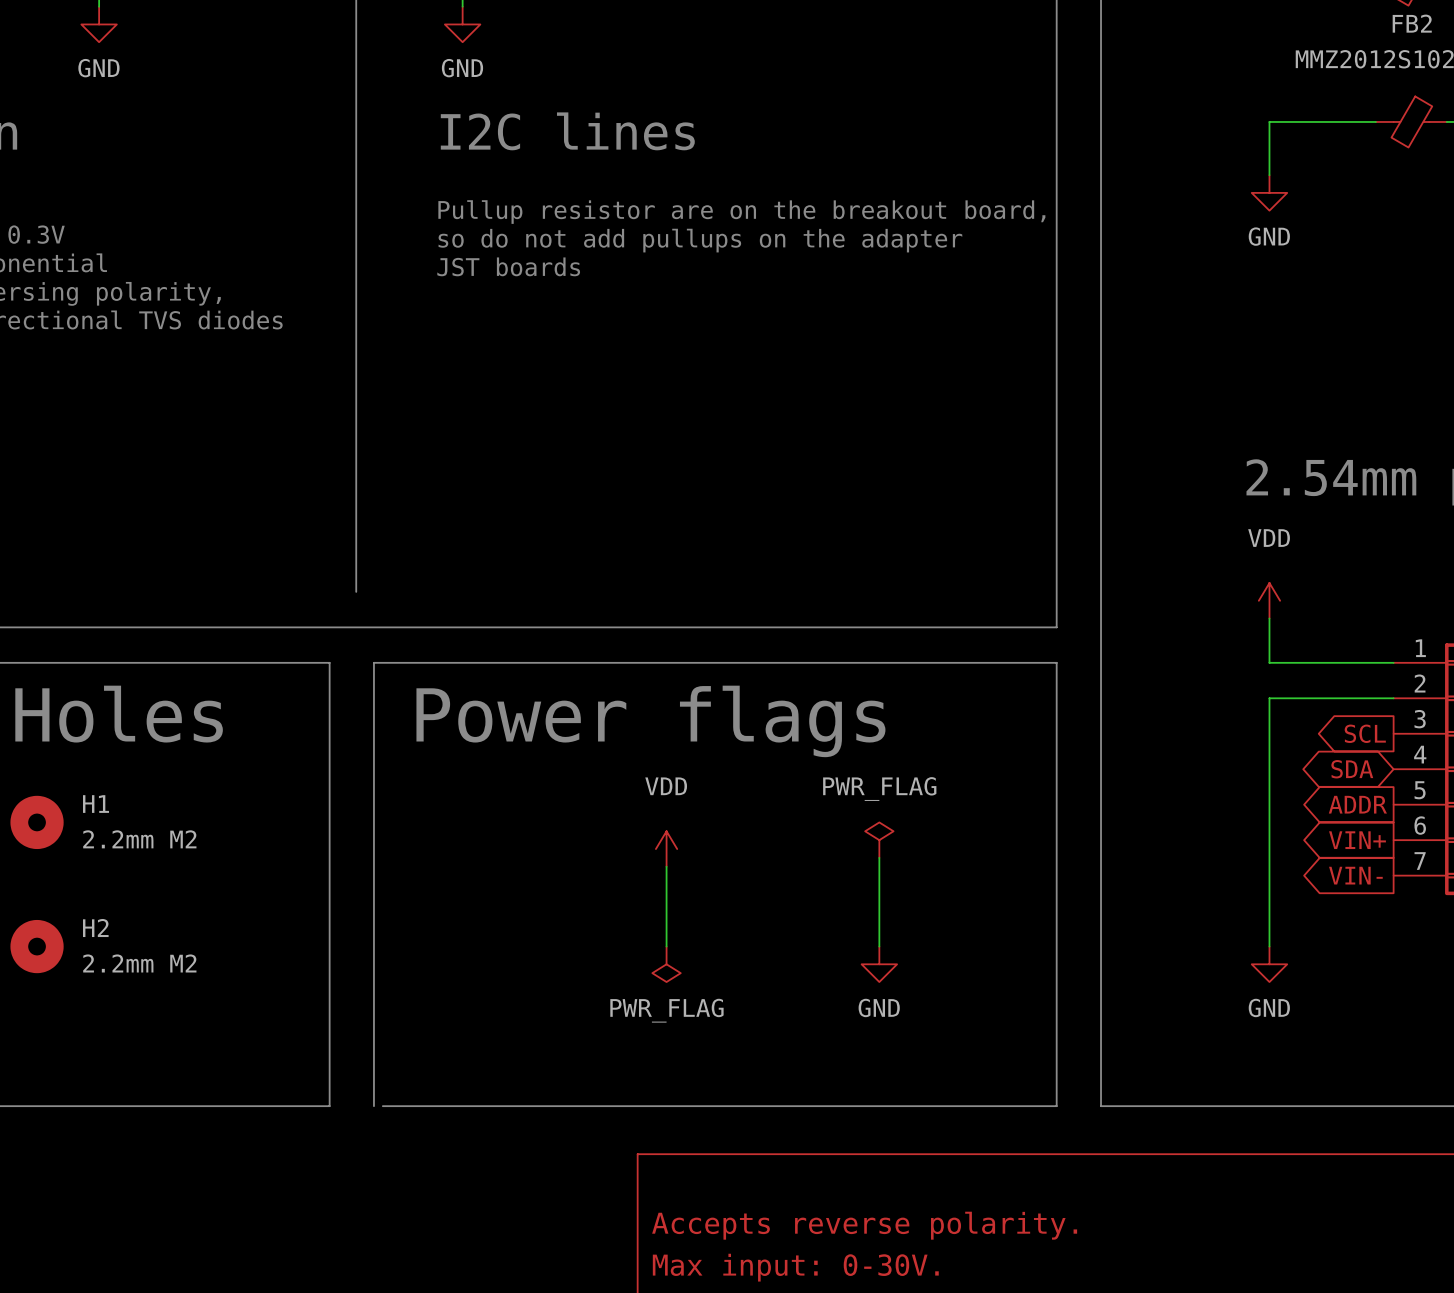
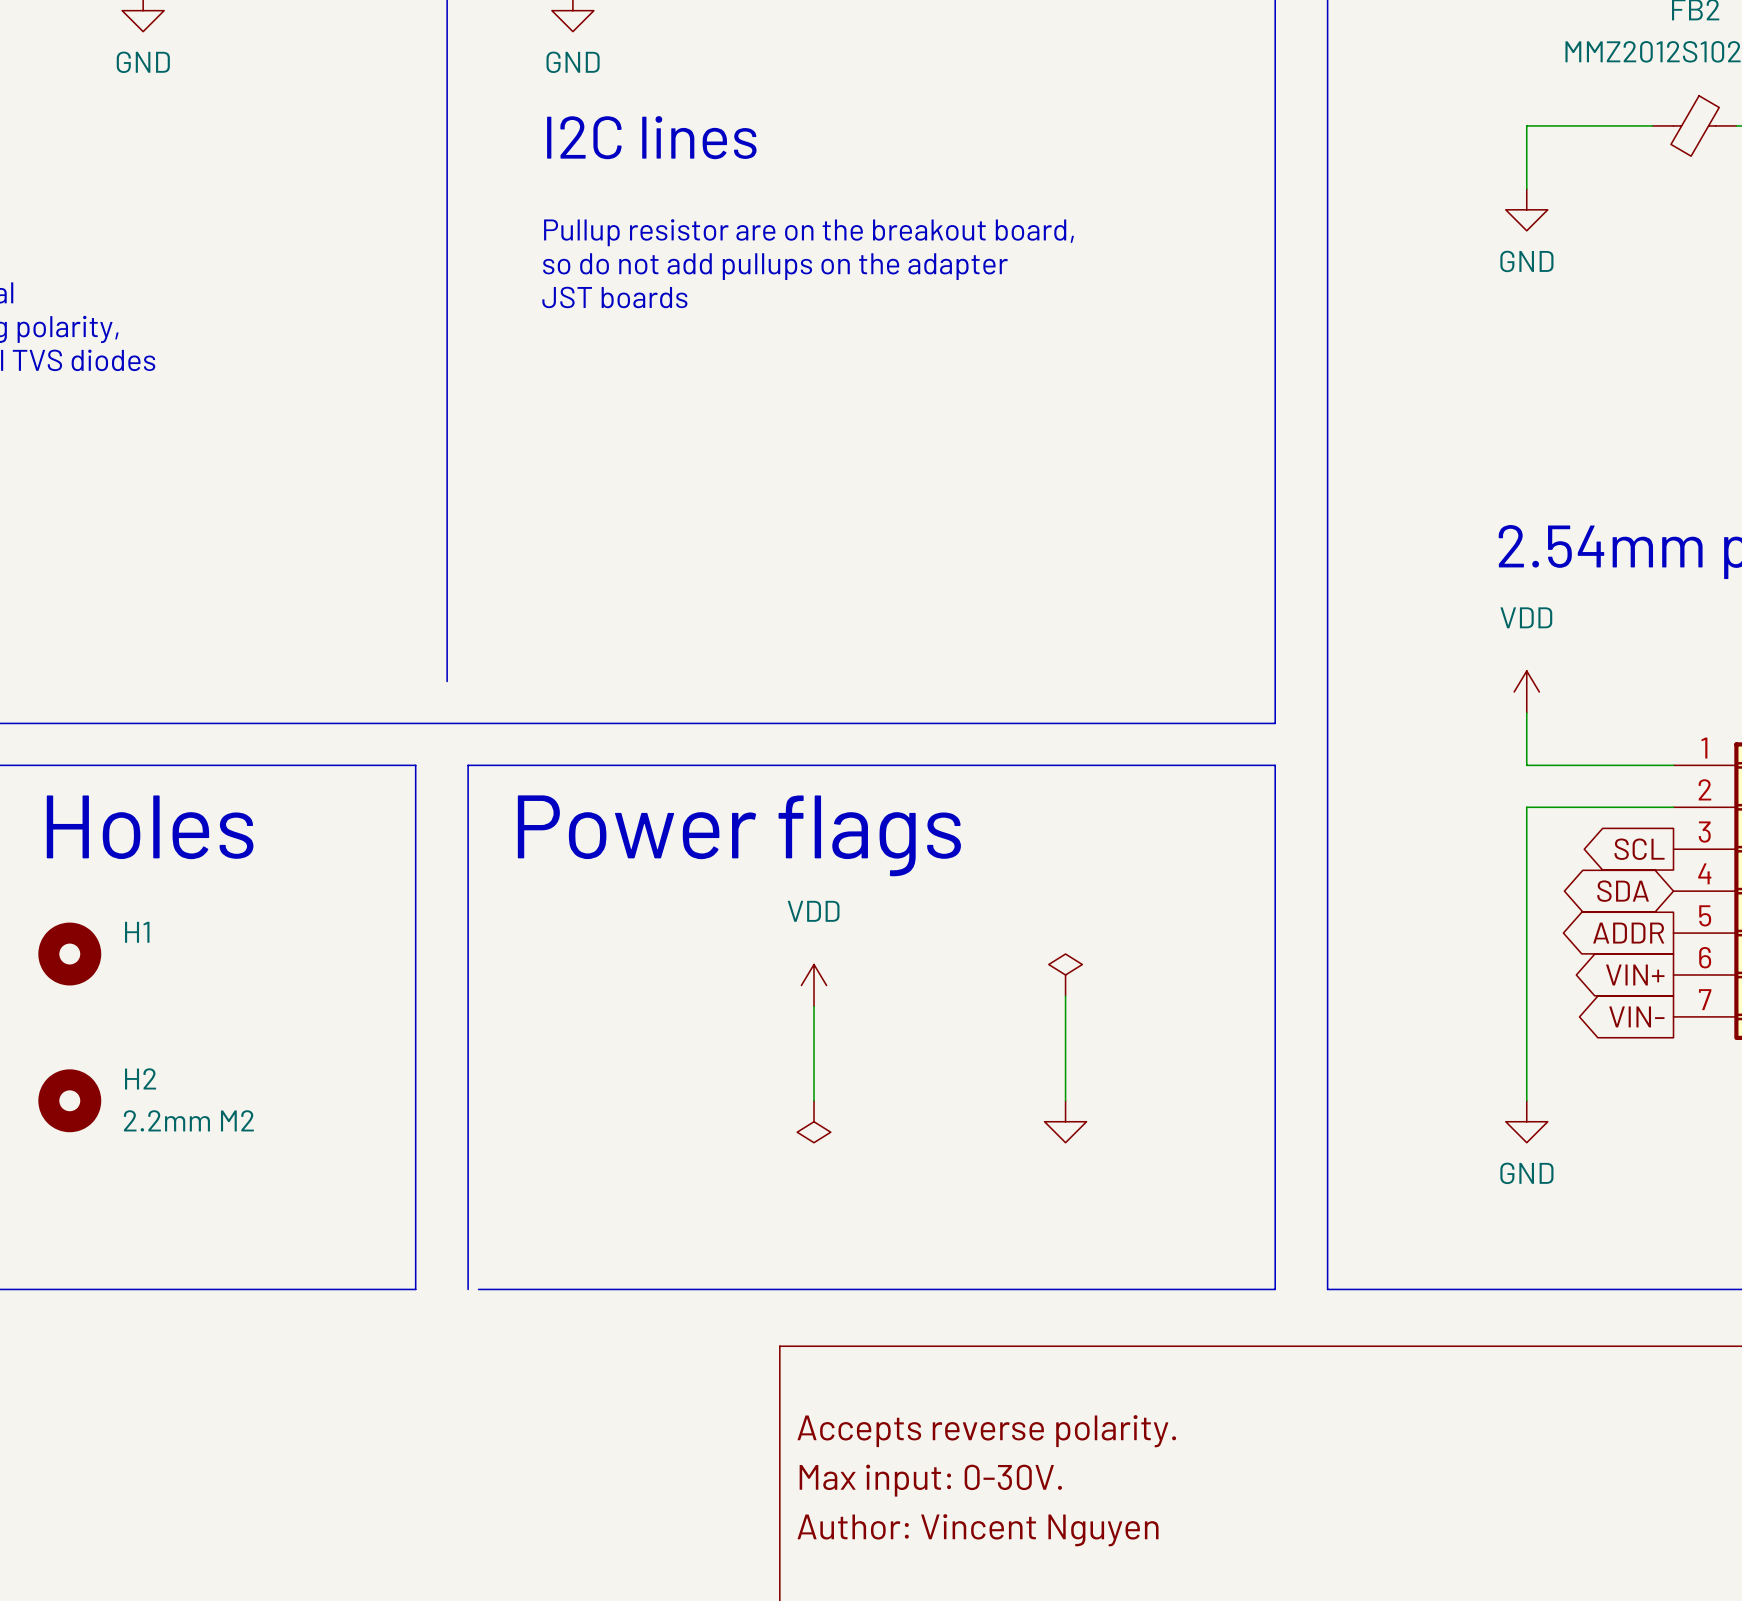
power symbol text: PWR_FLAG (879, 789) -> none
H1 value: 2.2mm M2 (139, 839) -> none
power symbol text: GND (879, 1007) -> none
power symbol text: PWR_FLAG (666, 1010) -> none

